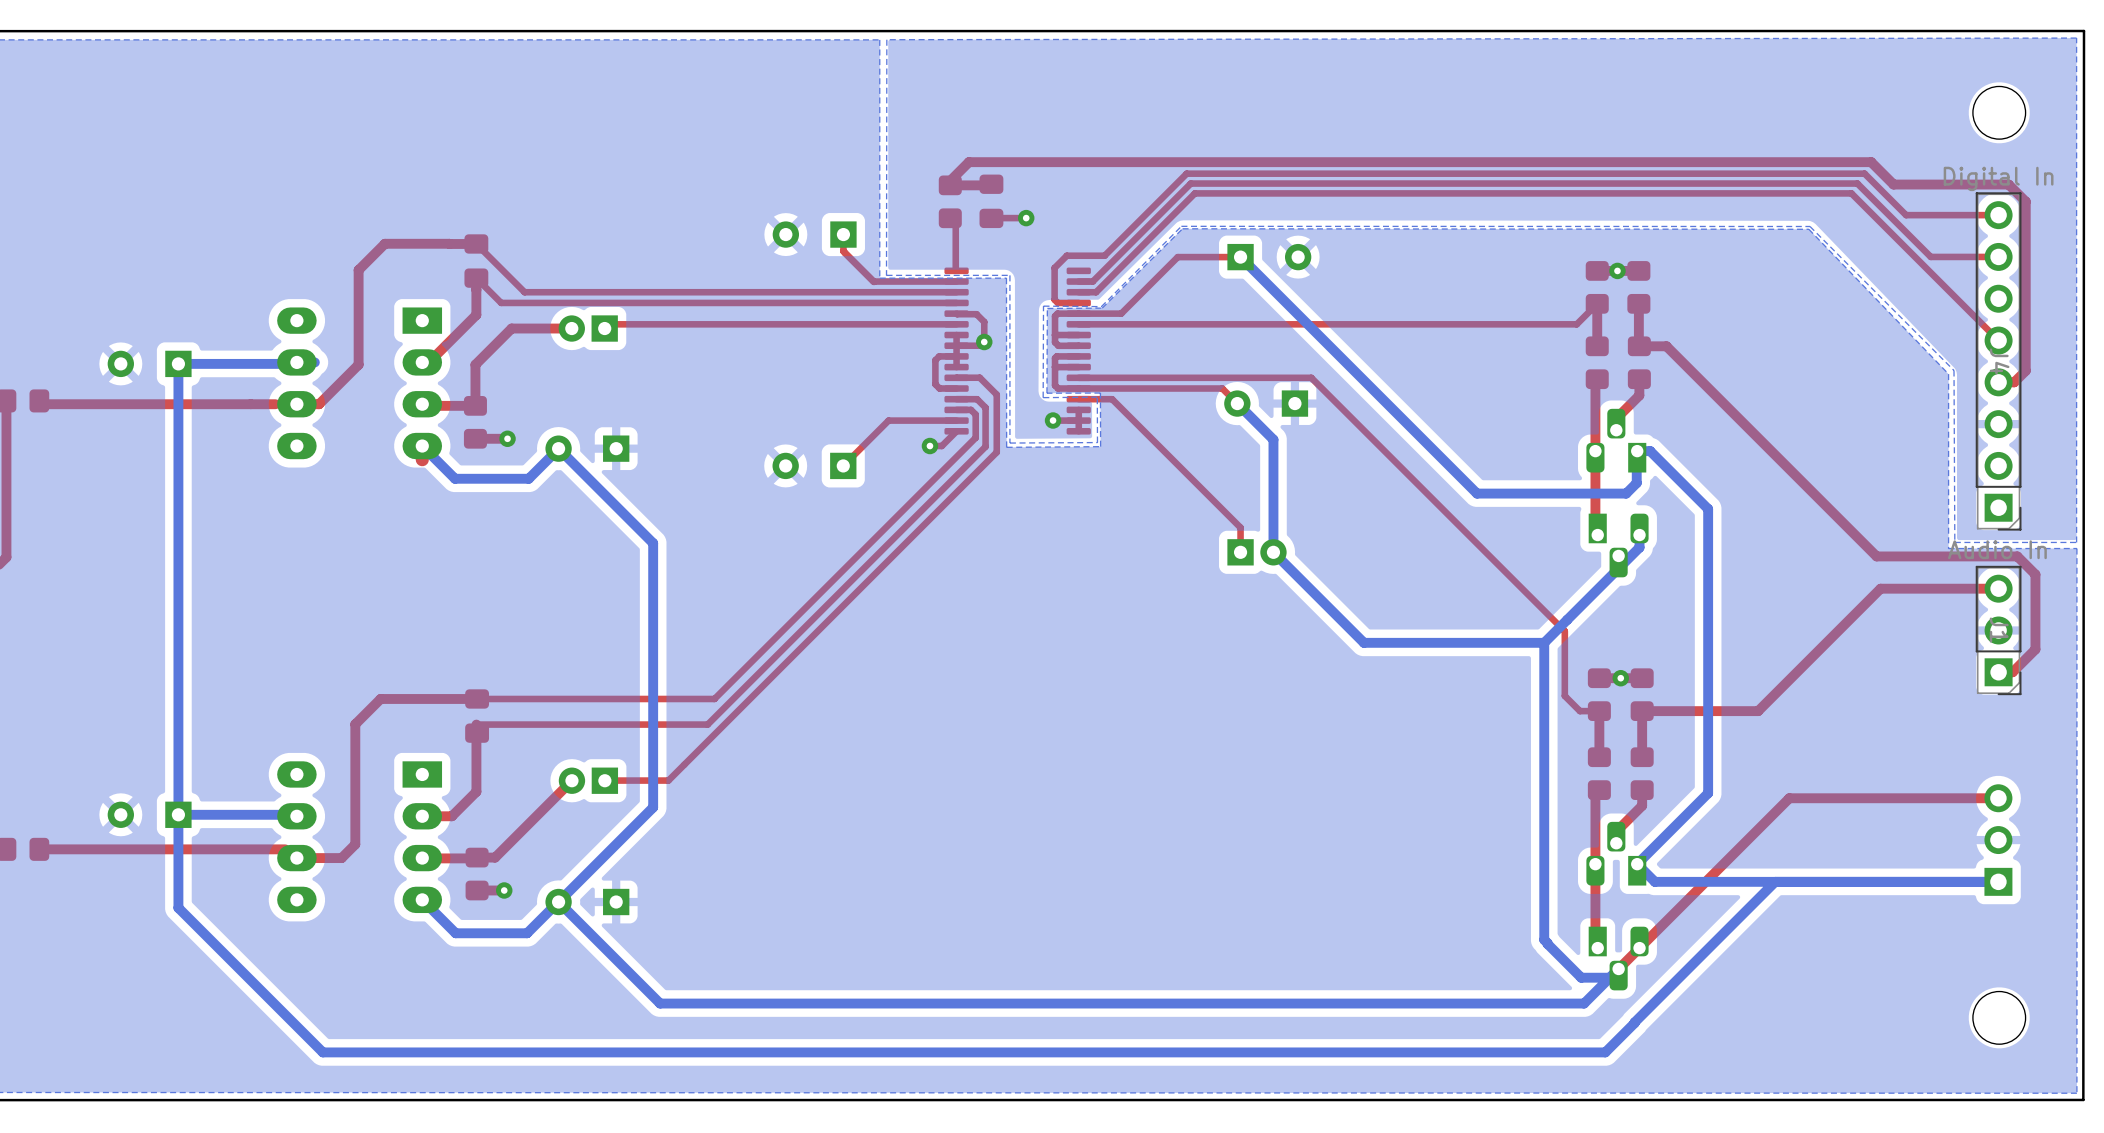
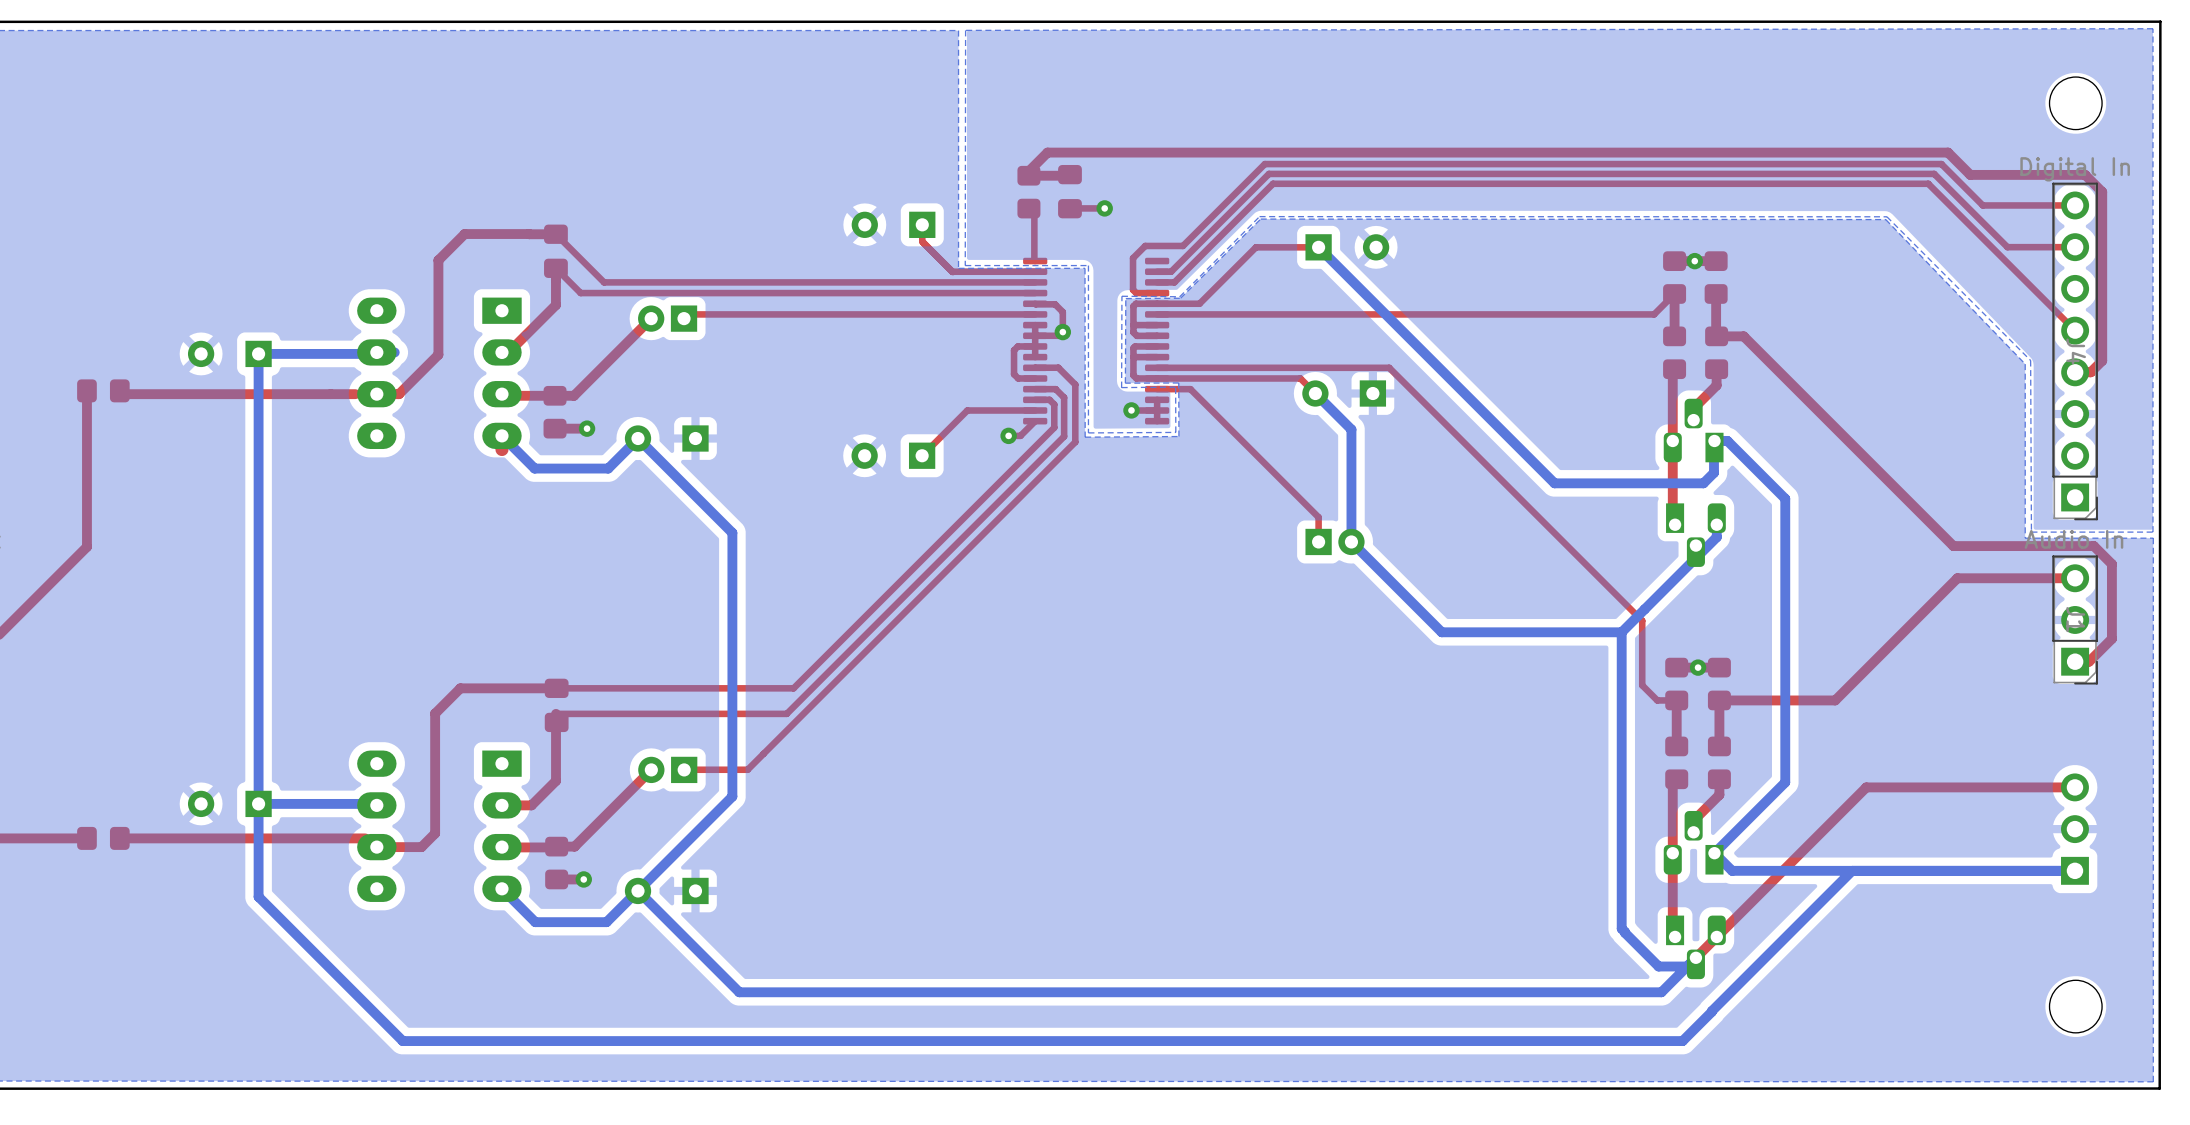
top track: (571, 328) (511, 328) (475, 364) (475, 405) -> (651, 318) (573, 395) (555, 395)

